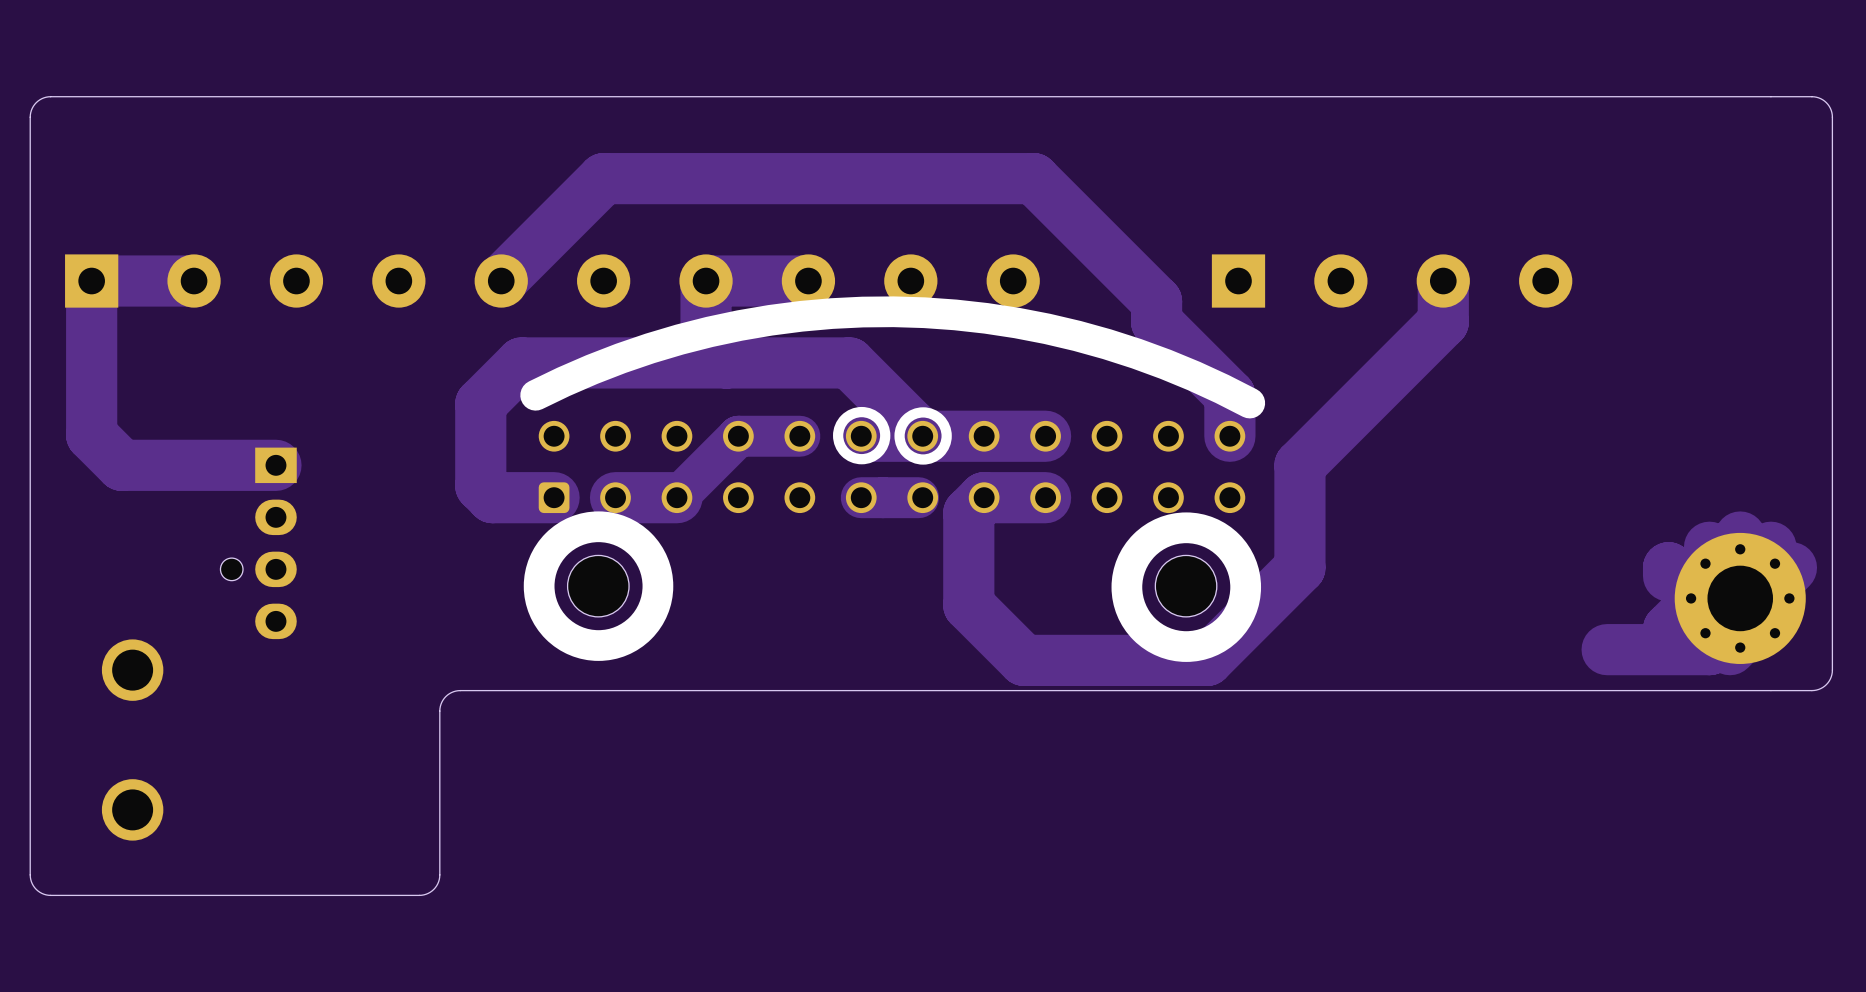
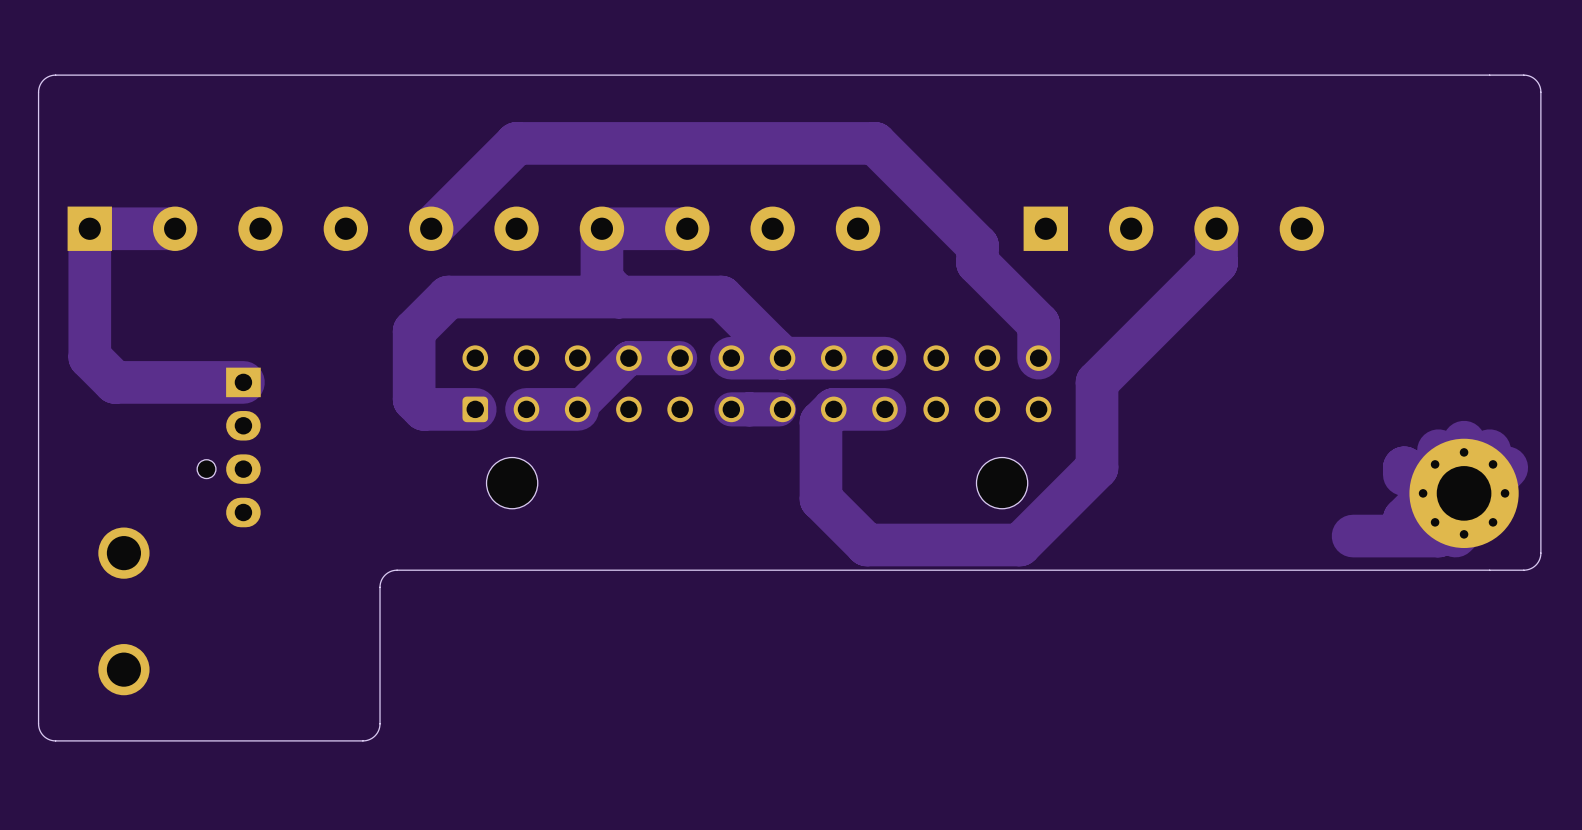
line: (535, 395) (620, 358) (709, 331) (801, 316) (893, 311) (986, 318) (1077, 335) (1165, 364) (1249, 403) -> none
drawing: [833, 406, 952, 465] -> none
drawing: [523, 511, 674, 661] -> none
drawing: [1111, 512, 1262, 662] -> none

